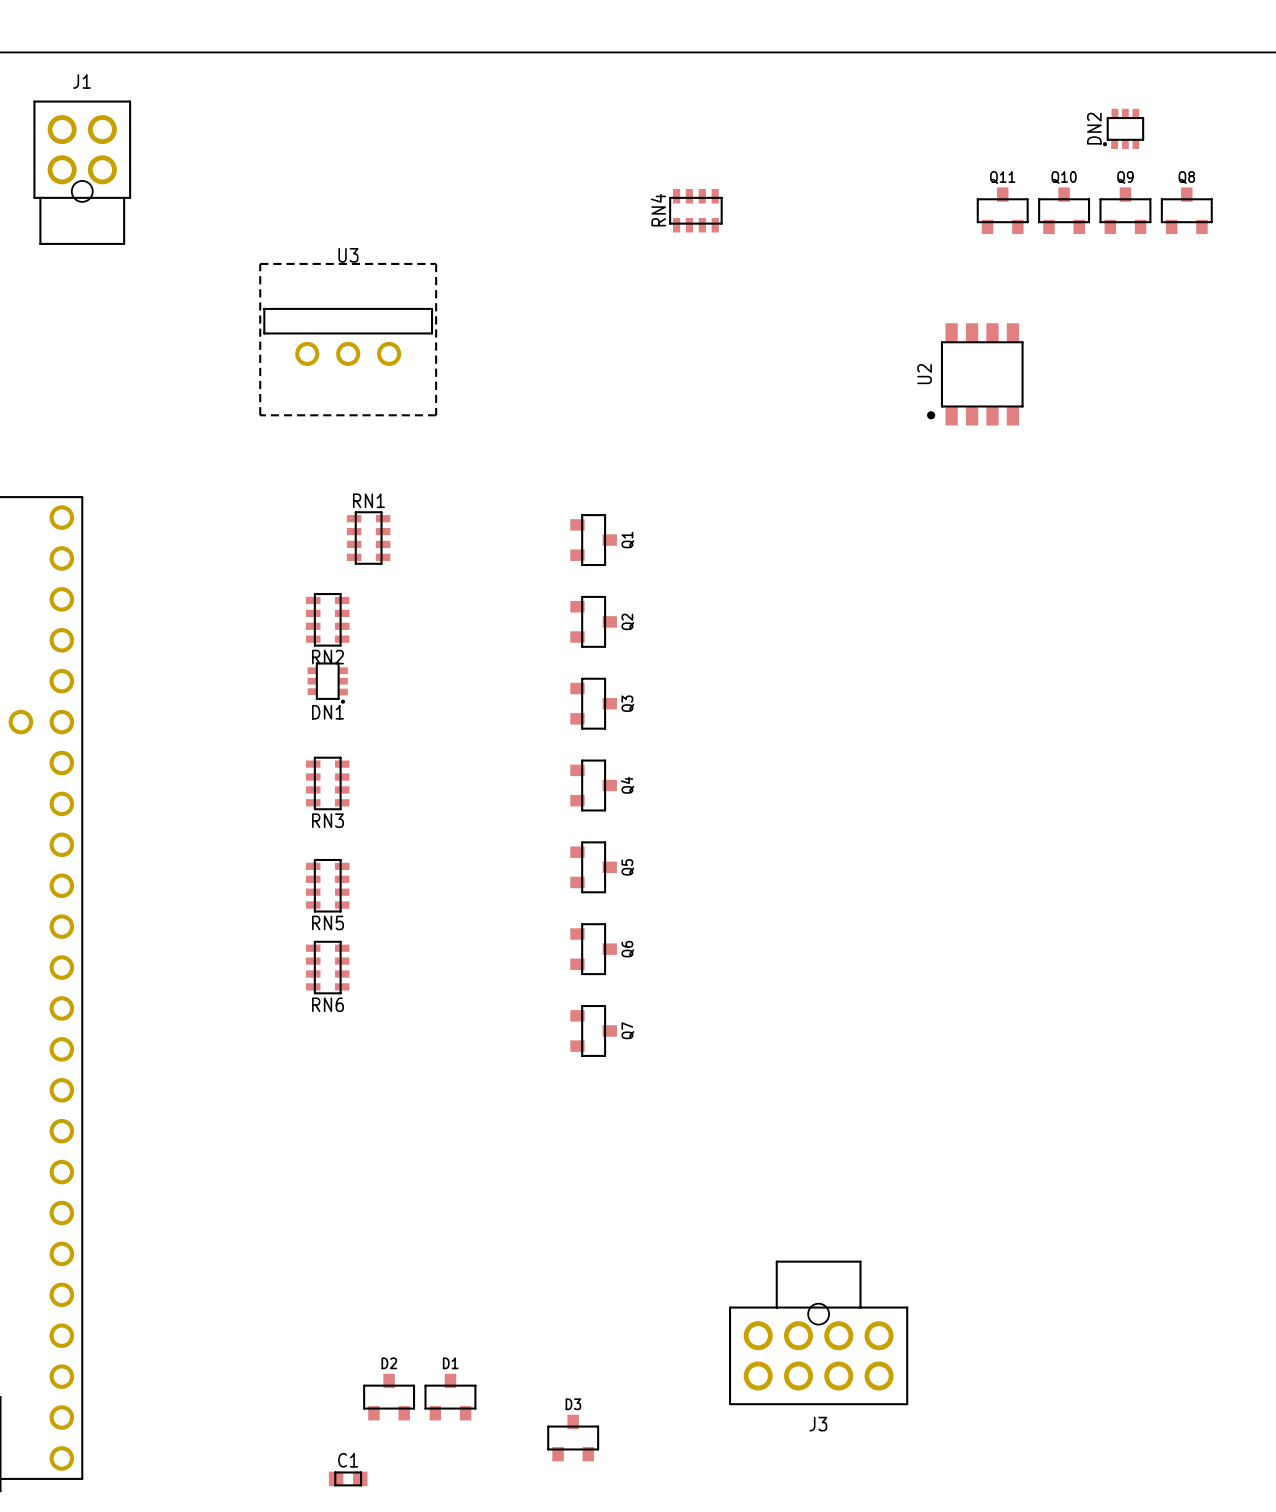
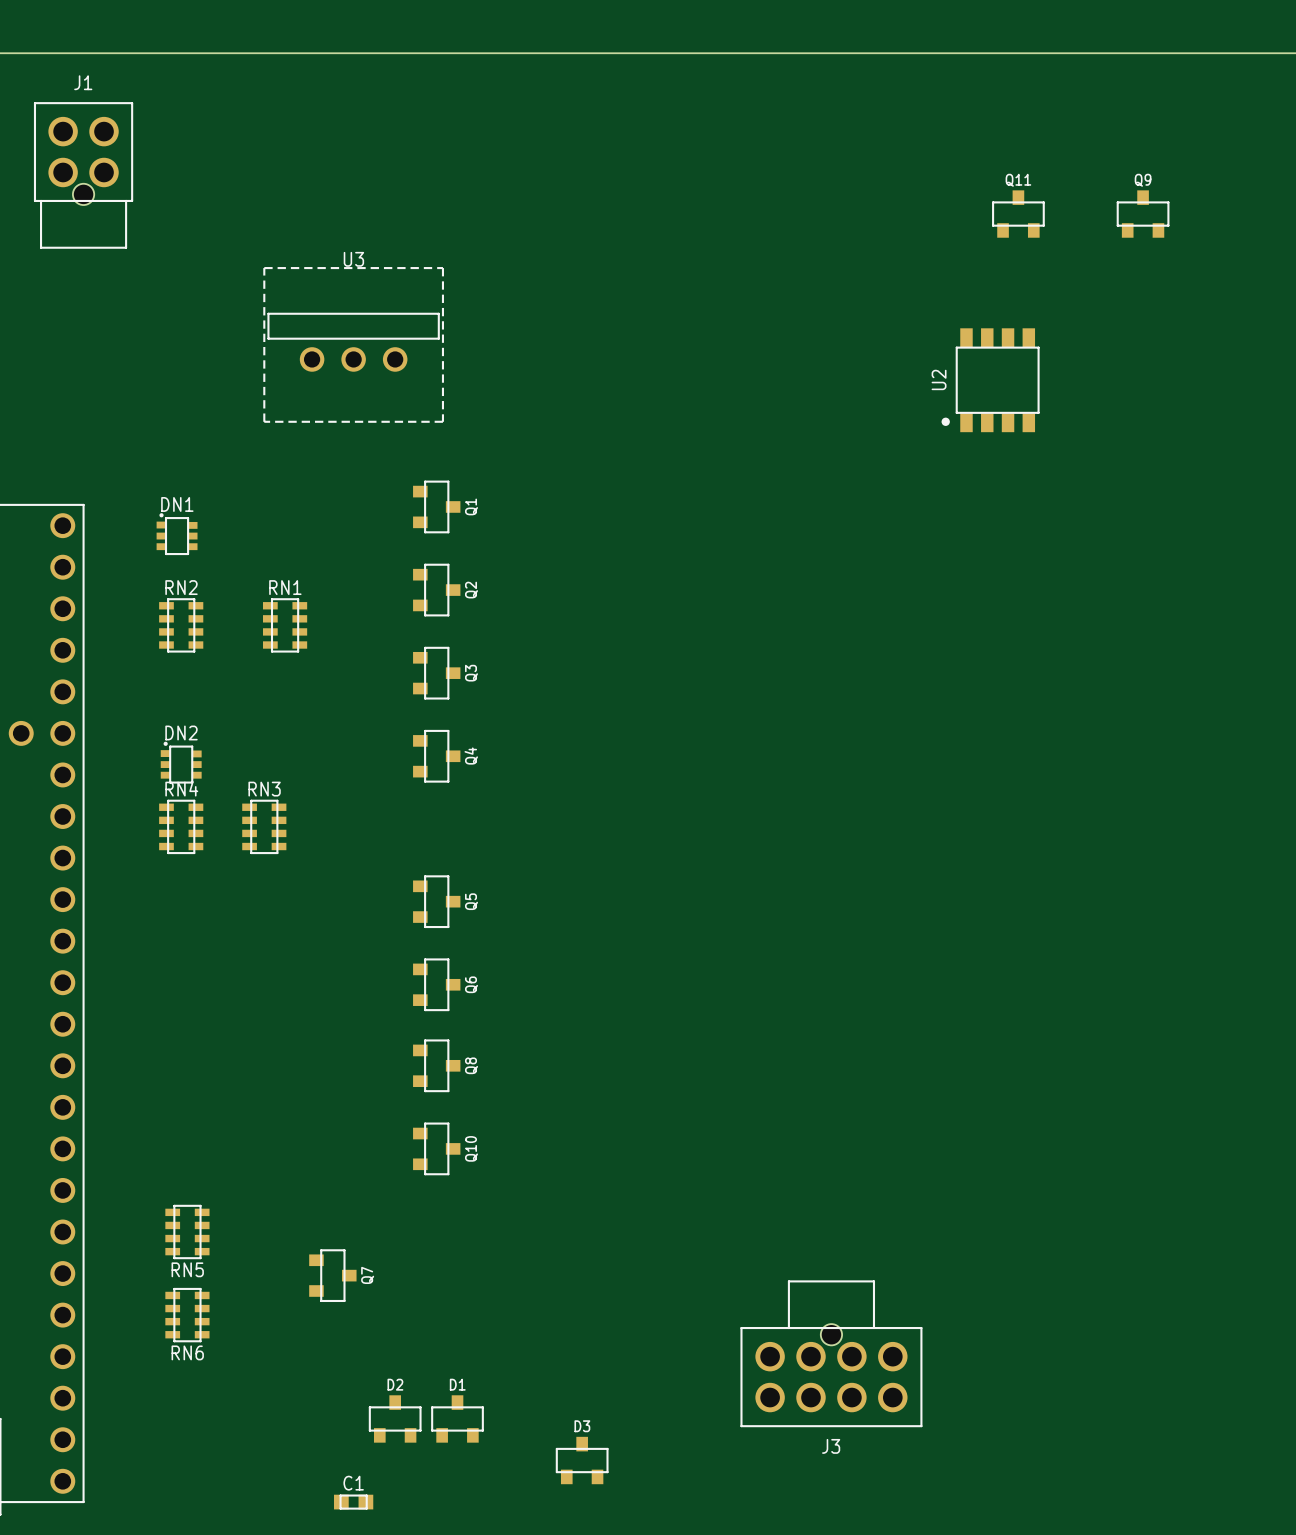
DN2 rotation: 0° (1123, 128) -> 90° clockwise (181, 762)
DN2 position: (1123, 128) -> (181, 762)
RN4 rotation: 0° (695, 210) -> 90° clockwise (181, 826)
RN4 position: (695, 210) -> (181, 826)
Q10 rotation: 0° (1064, 210) -> 90° clockwise (436, 1148)
Q10 position: (1064, 210) -> (436, 1148)
Q8 rotation: 0° (1186, 210) -> 90° clockwise (436, 1065)
Q8 position: (1186, 210) -> (436, 1065)
RN1 position: (368, 538) -> (285, 625)
Q1 position: (593, 540) -> (436, 506)
RN2 position: (327, 619) -> (181, 625)
Q2 position: (593, 621) -> (436, 590)
RN2 name position: RN2 (328, 657) -> RN2 (181, 587)
DN1 rotation: 0° (327, 683) -> 180° (177, 534)
DN1 position: (327, 683) -> (177, 534)
Q3 position: (593, 703) -> (436, 673)
RN3 position: (327, 783) -> (264, 826)
Q4 position: (593, 785) -> (436, 756)
RN3 name position: RN3 (328, 820) -> RN3 (264, 789)
Q5 position: (593, 867) -> (436, 901)
RN5 position: (327, 885) -> (187, 1232)
Q6 position: (593, 949) -> (436, 984)
RN6 position: (327, 967) -> (187, 1315)
Q7 position: (593, 1030) -> (332, 1275)

